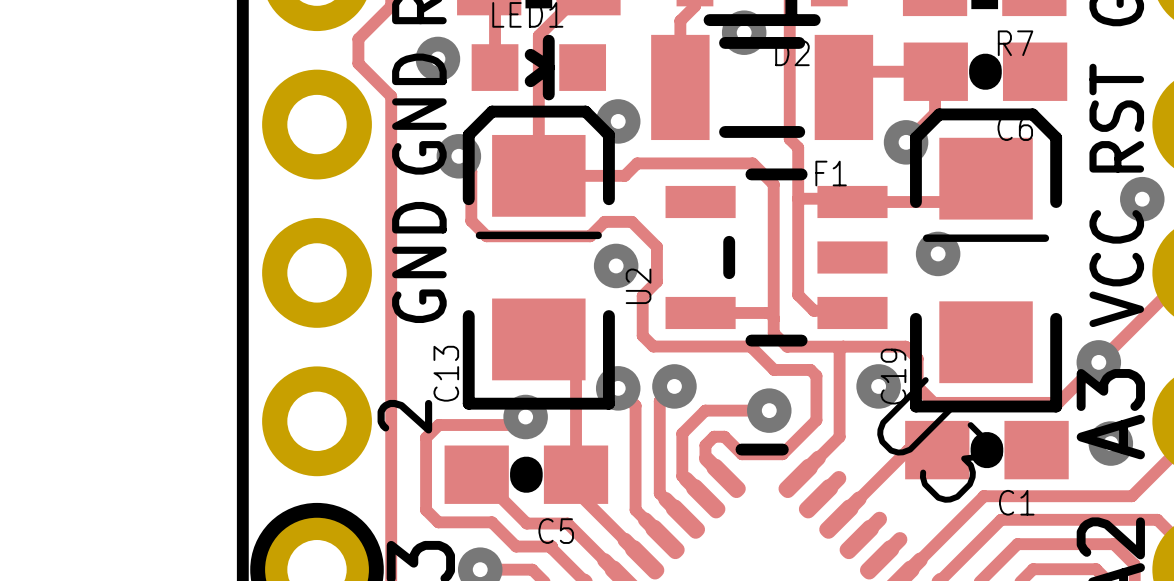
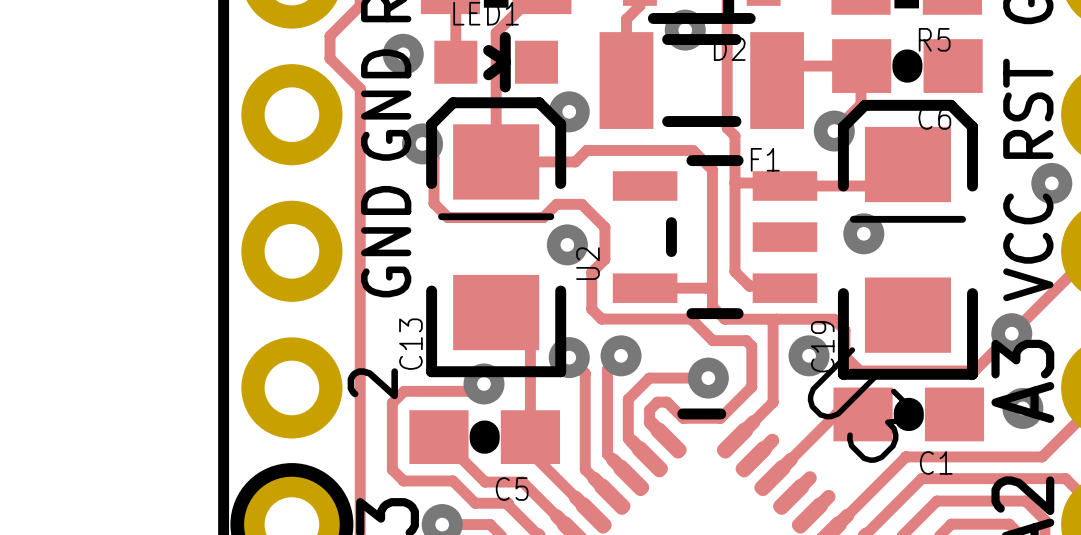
R7 name: R7 (1015, 43) -> R5 (934, 39)

